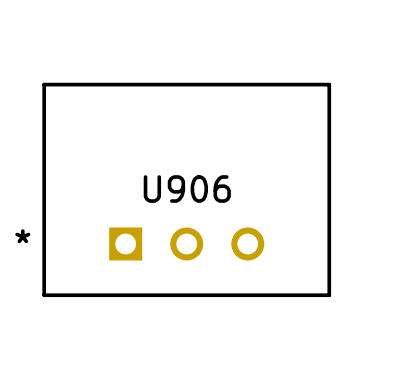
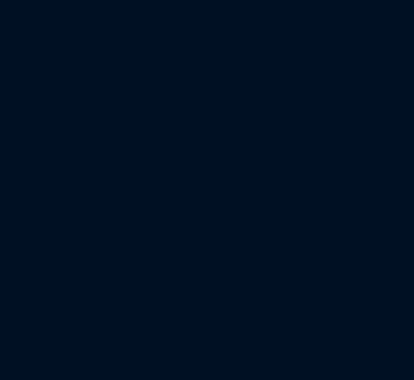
U906: (186, 189) -> none

